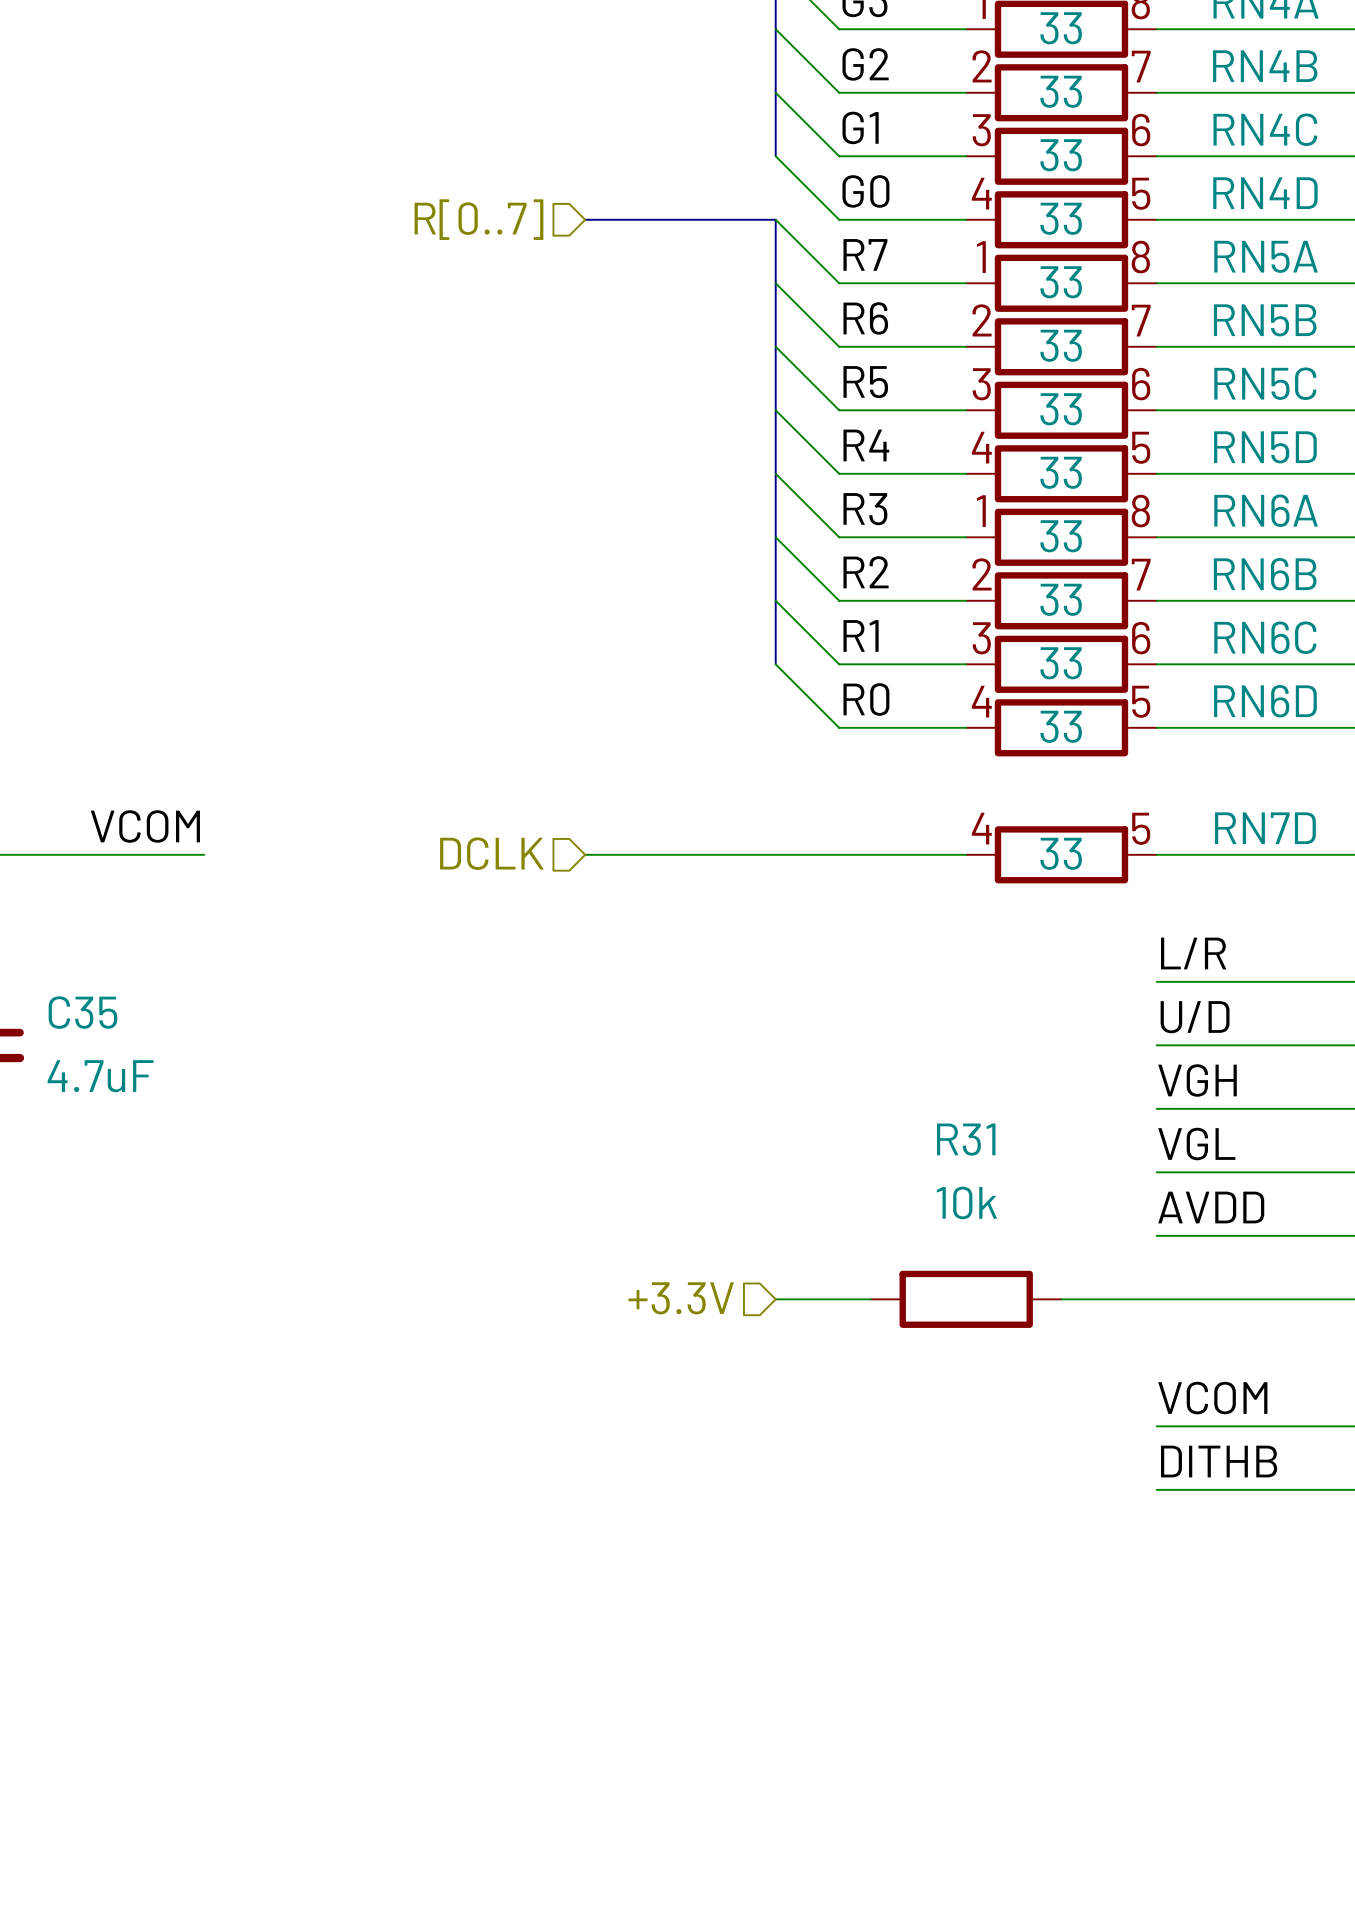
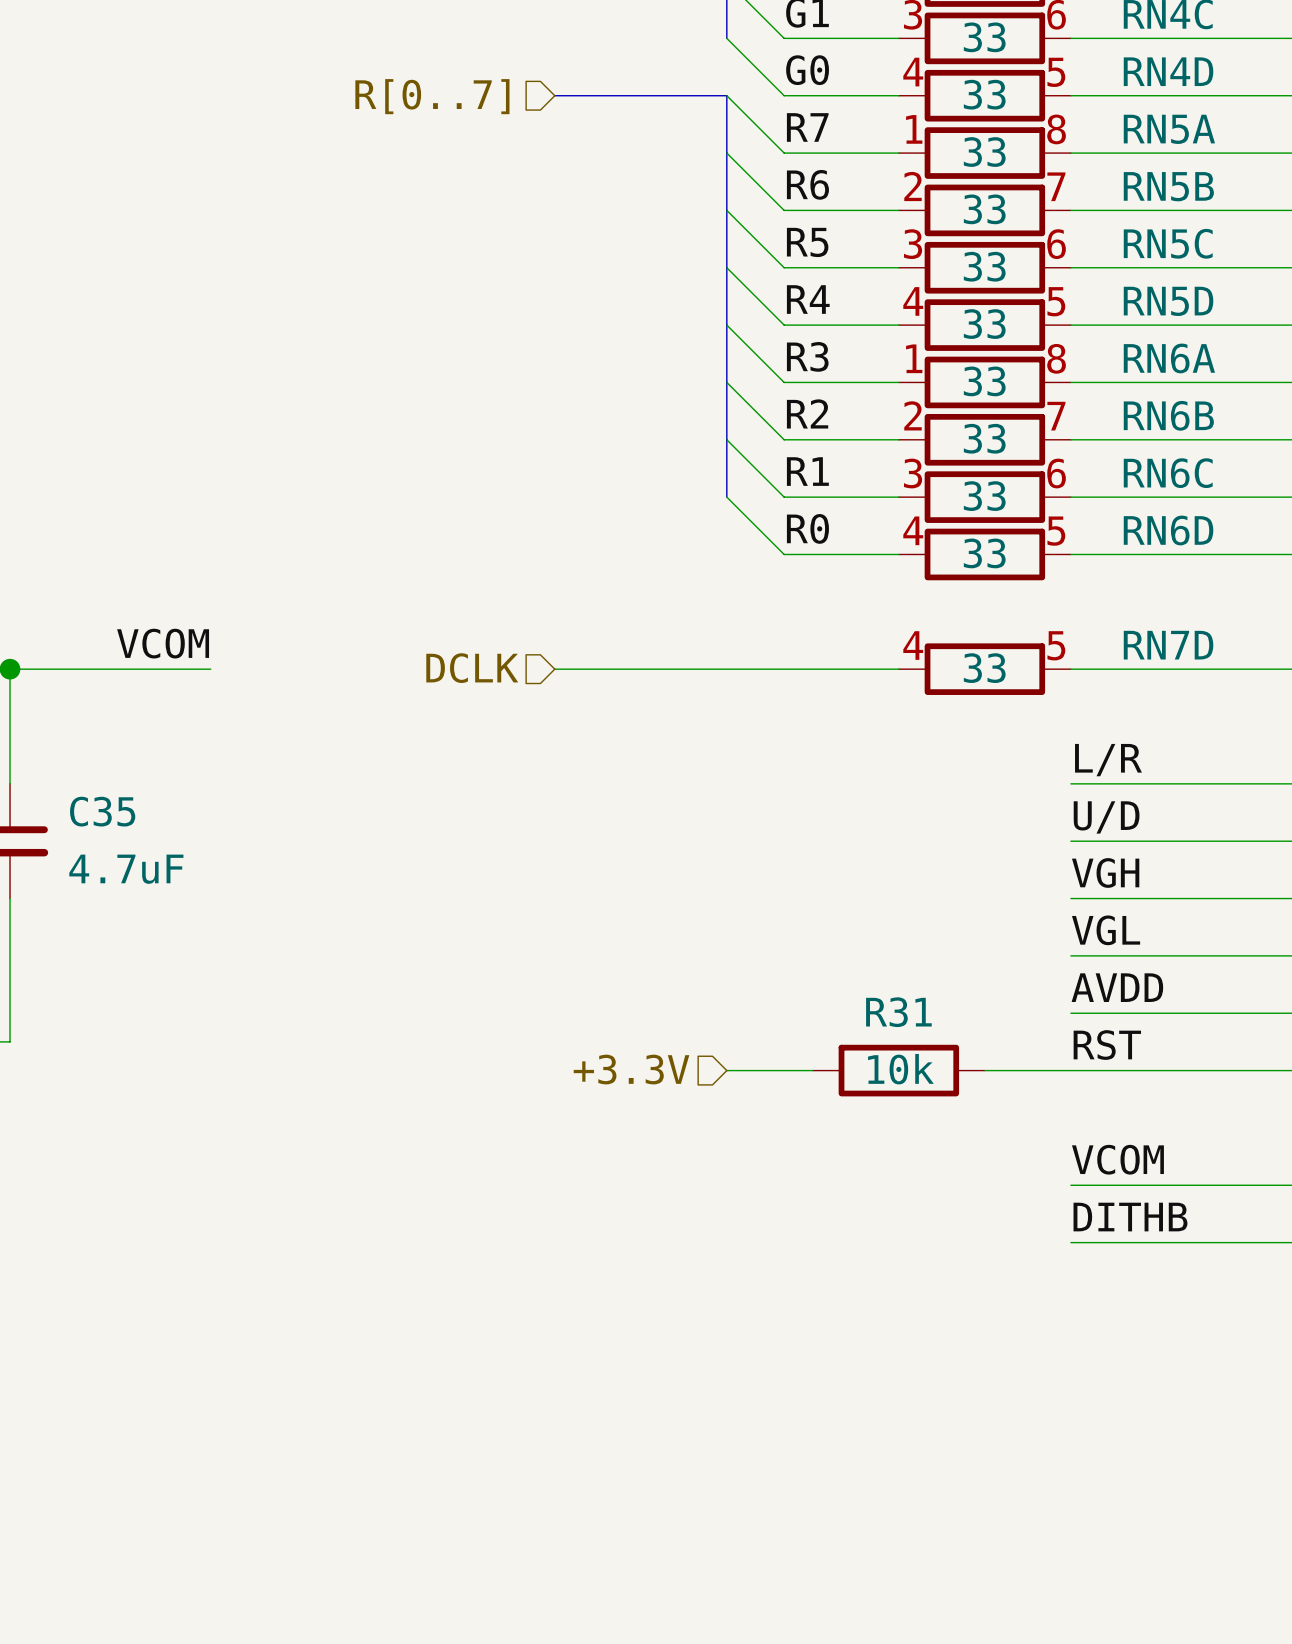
R31 name position: R31 (966, 1139) -> R31 (898, 1012)
R31 value position: 10k (966, 1202) -> 10k (900, 1069)
label: none -> RST (1107, 1045)

